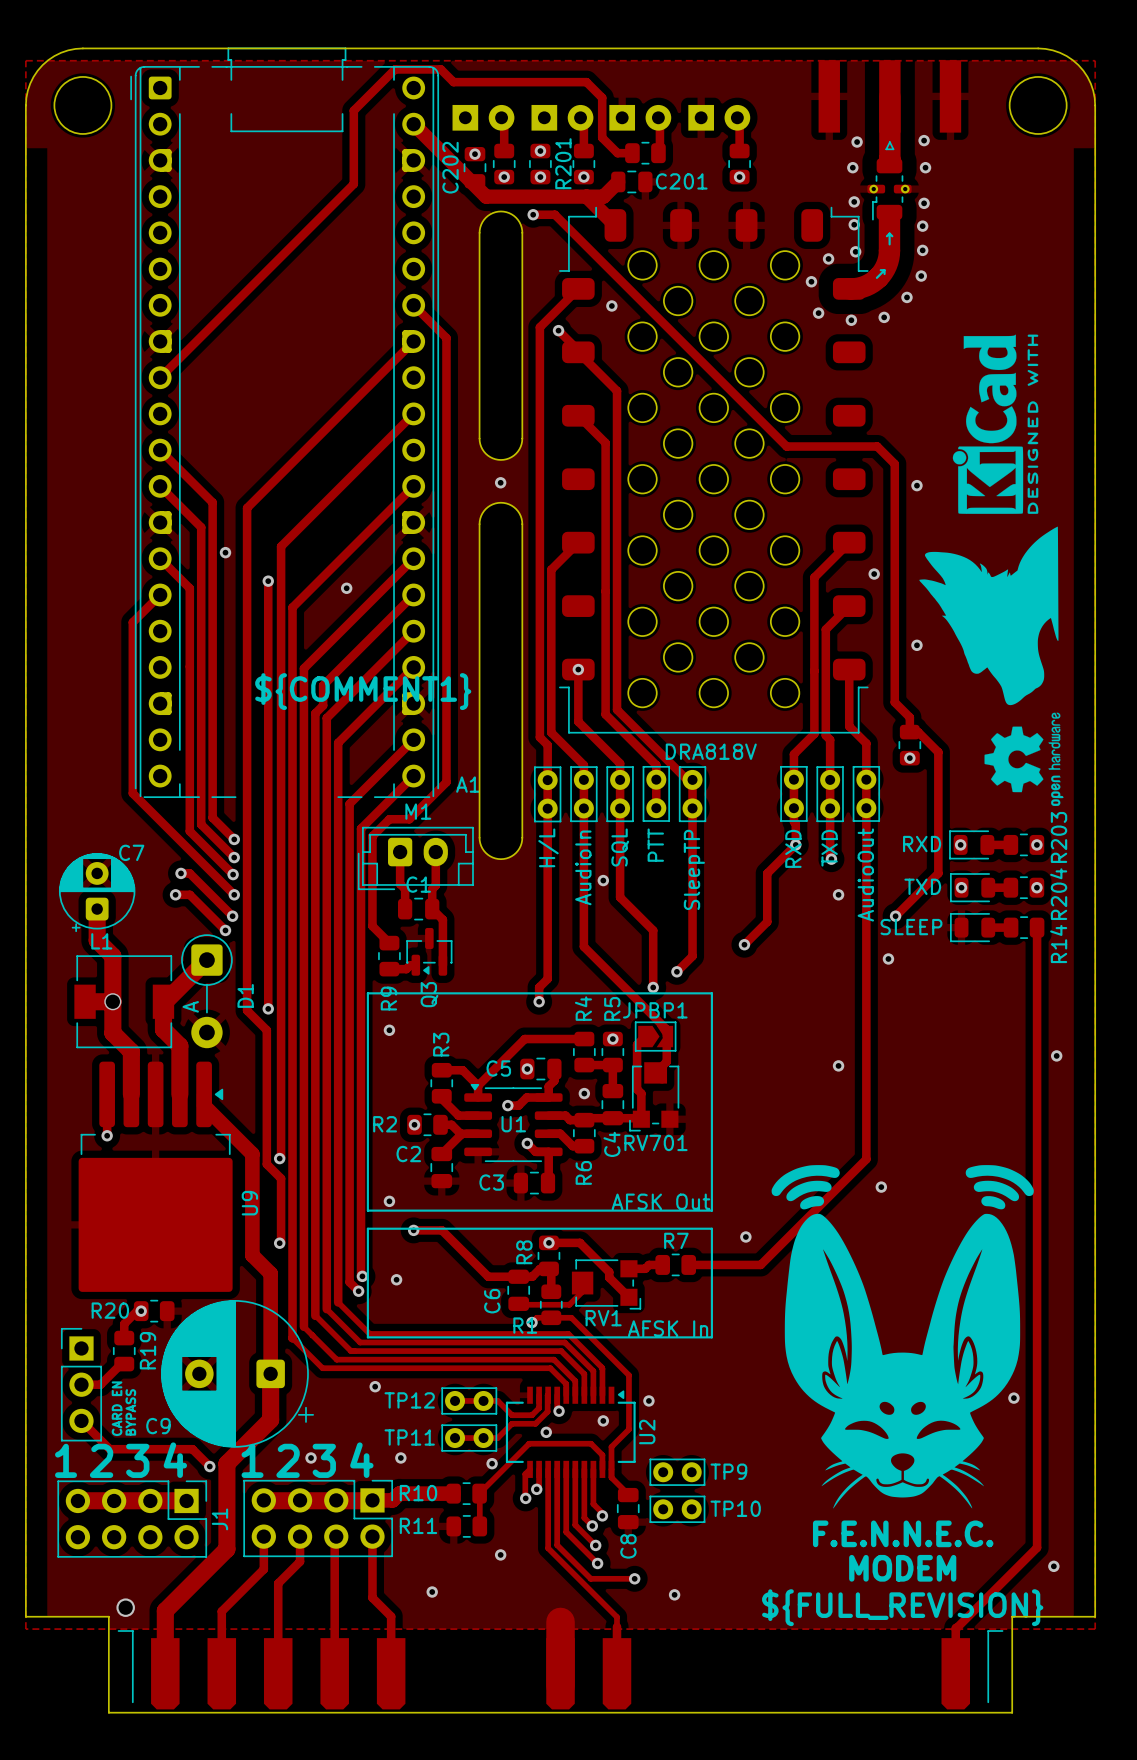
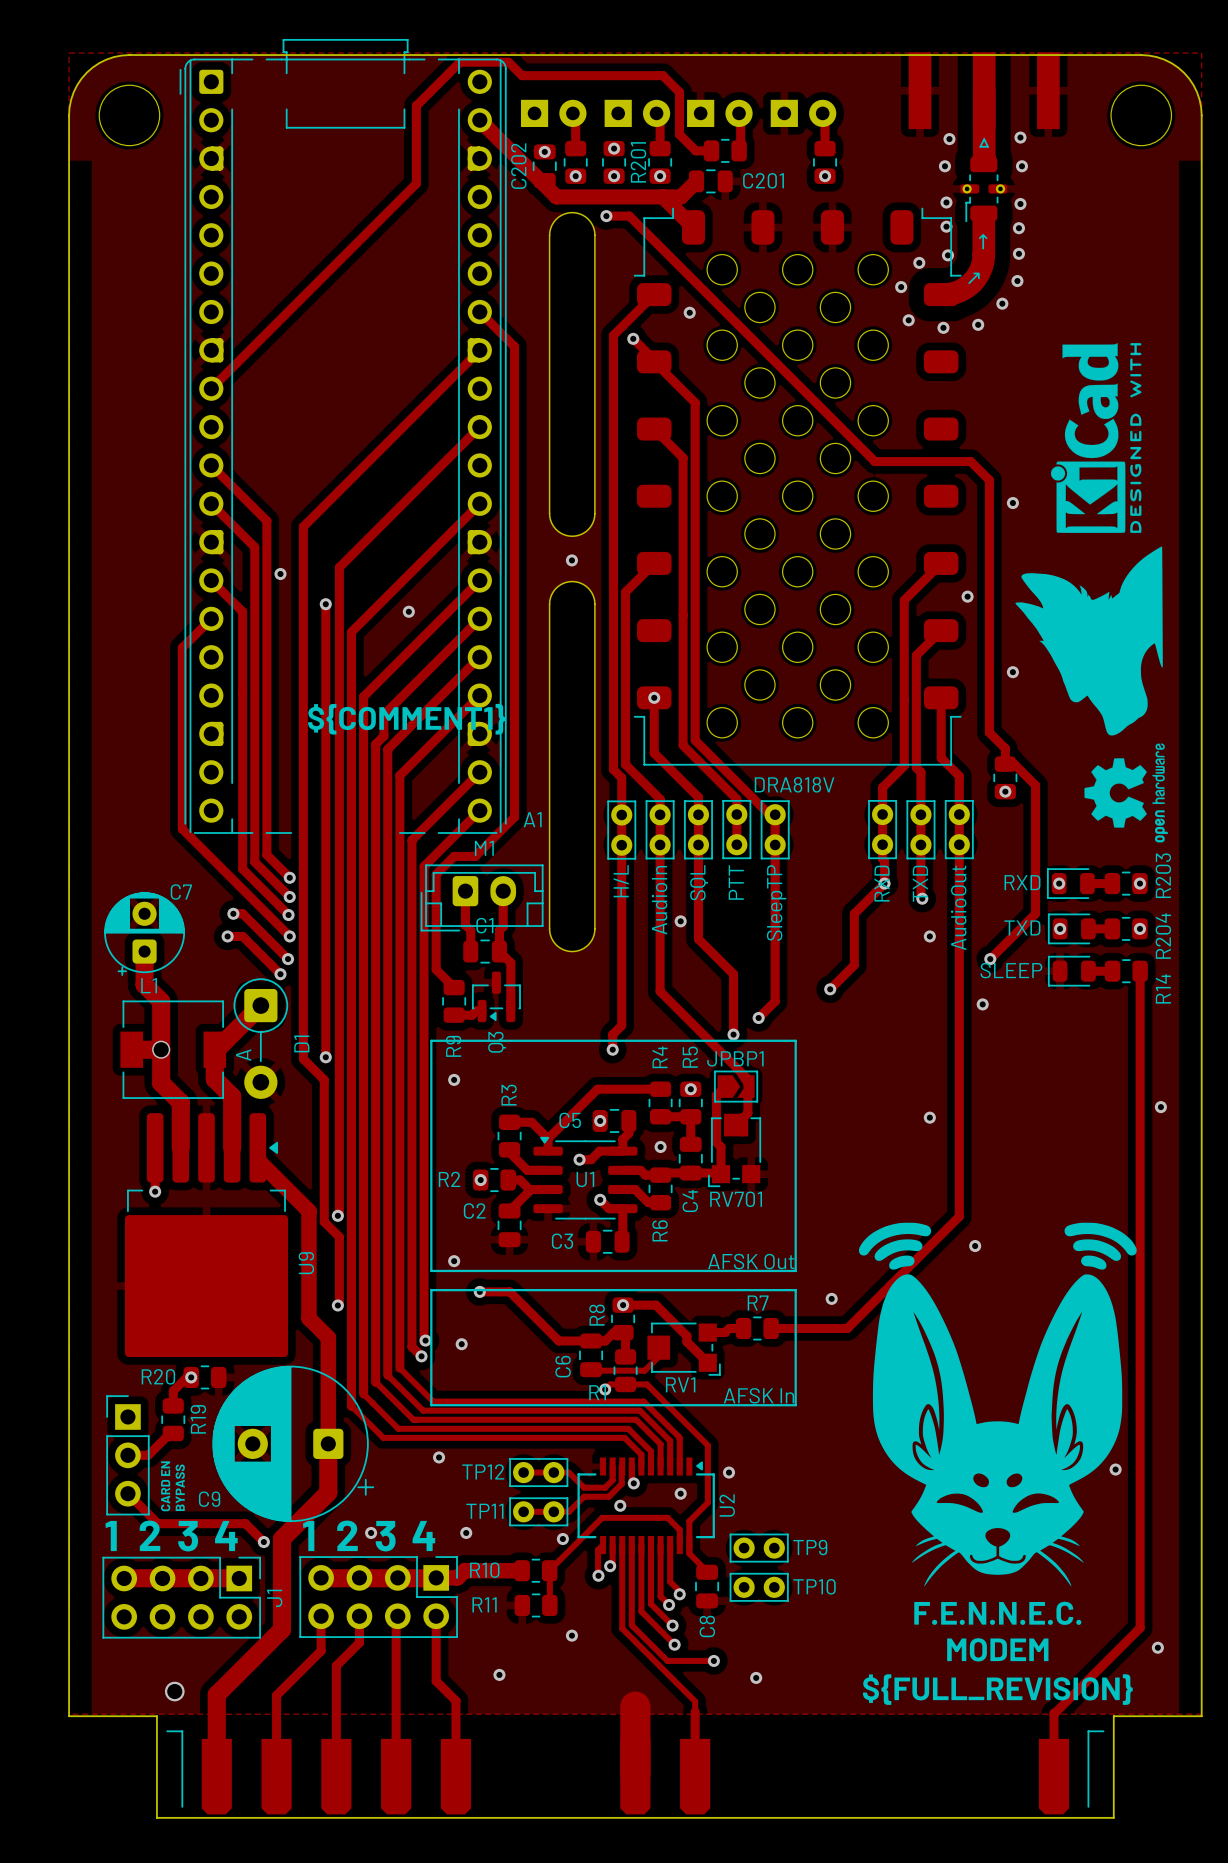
board edge: (479, 438) (481, 446) (485, 453) (492, 458) (500, 459) (509, 458) (516, 453) (520, 446) (522, 438) -> (549, 453) (550, 519) (558, 531) (572, 536) (586, 531) (594, 519) (594, 453)
via position: (500, 482) -> (571, 560)
board edge: (479, 581) (480, 518) (487, 507) (500, 502) (513, 507) (521, 518) (522, 581) -> (549, 604) (551, 595) (556, 588) (563, 583) (572, 581) (580, 583) (588, 588) (593, 595) (594, 604)
board edge: (479, 837) (481, 845) (485, 852) (492, 857) (500, 859) (509, 857) (516, 852) (520, 845) (522, 837) -> (549, 876) (550, 934) (558, 946) (572, 951) (586, 946) (594, 934) (594, 876)
part position: (560, 880) -> (635, 936)

